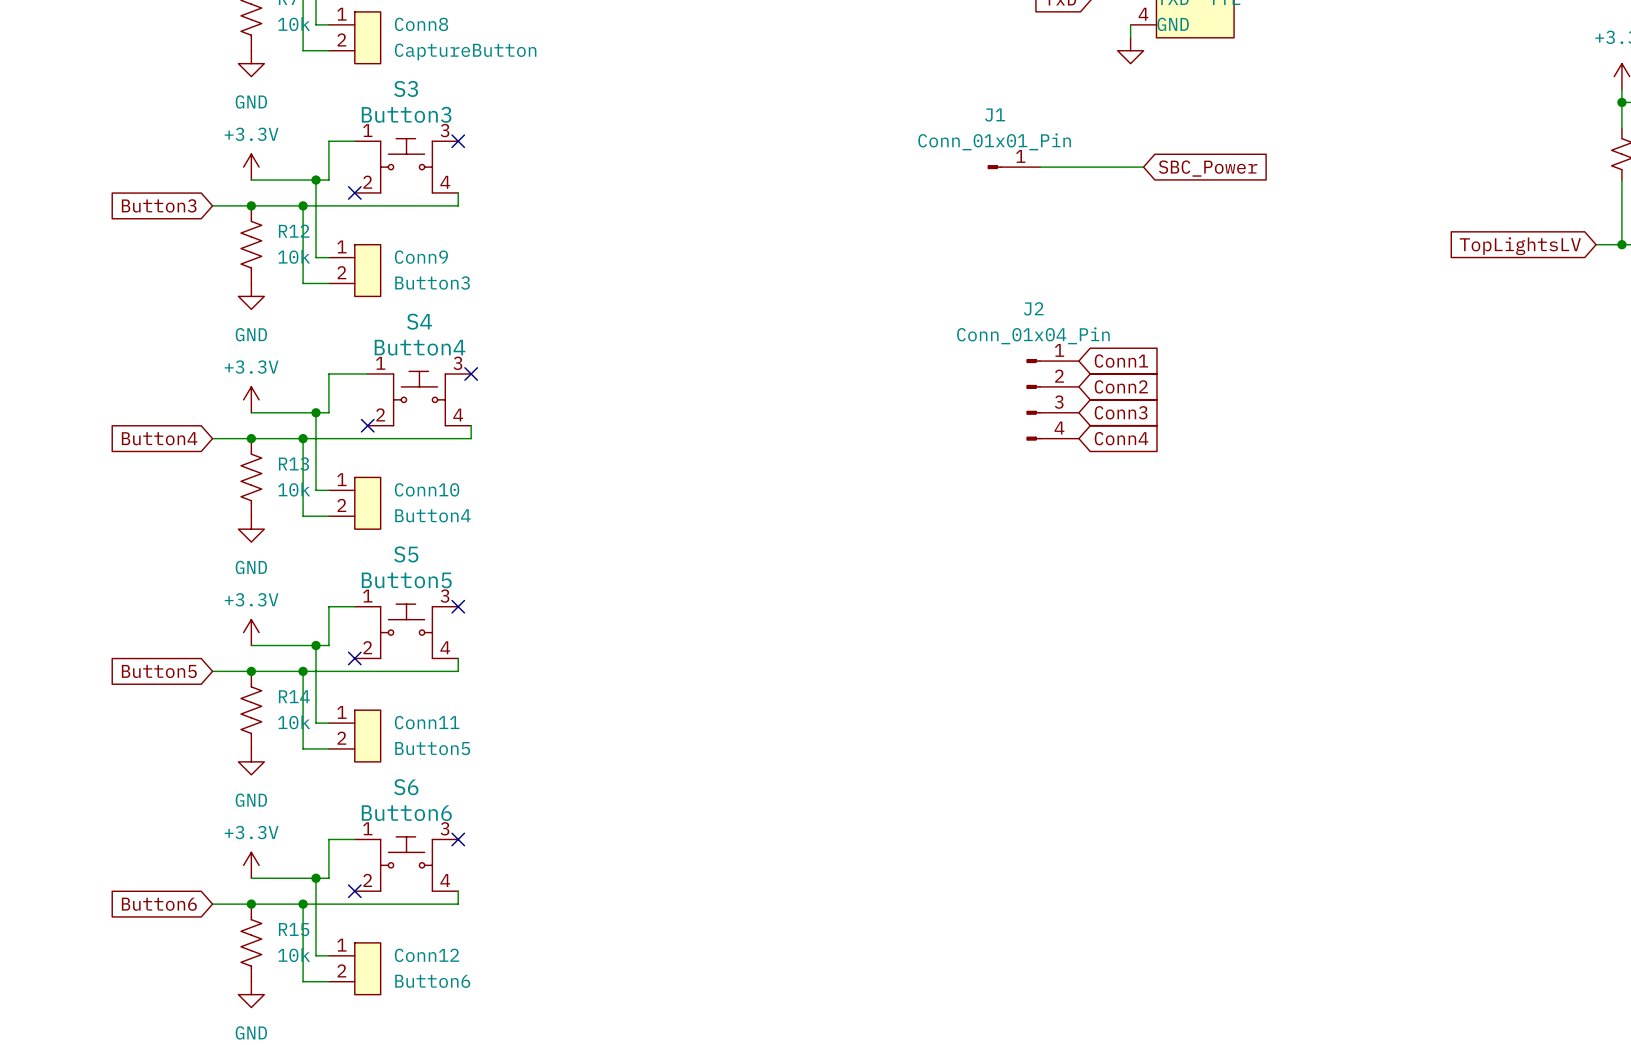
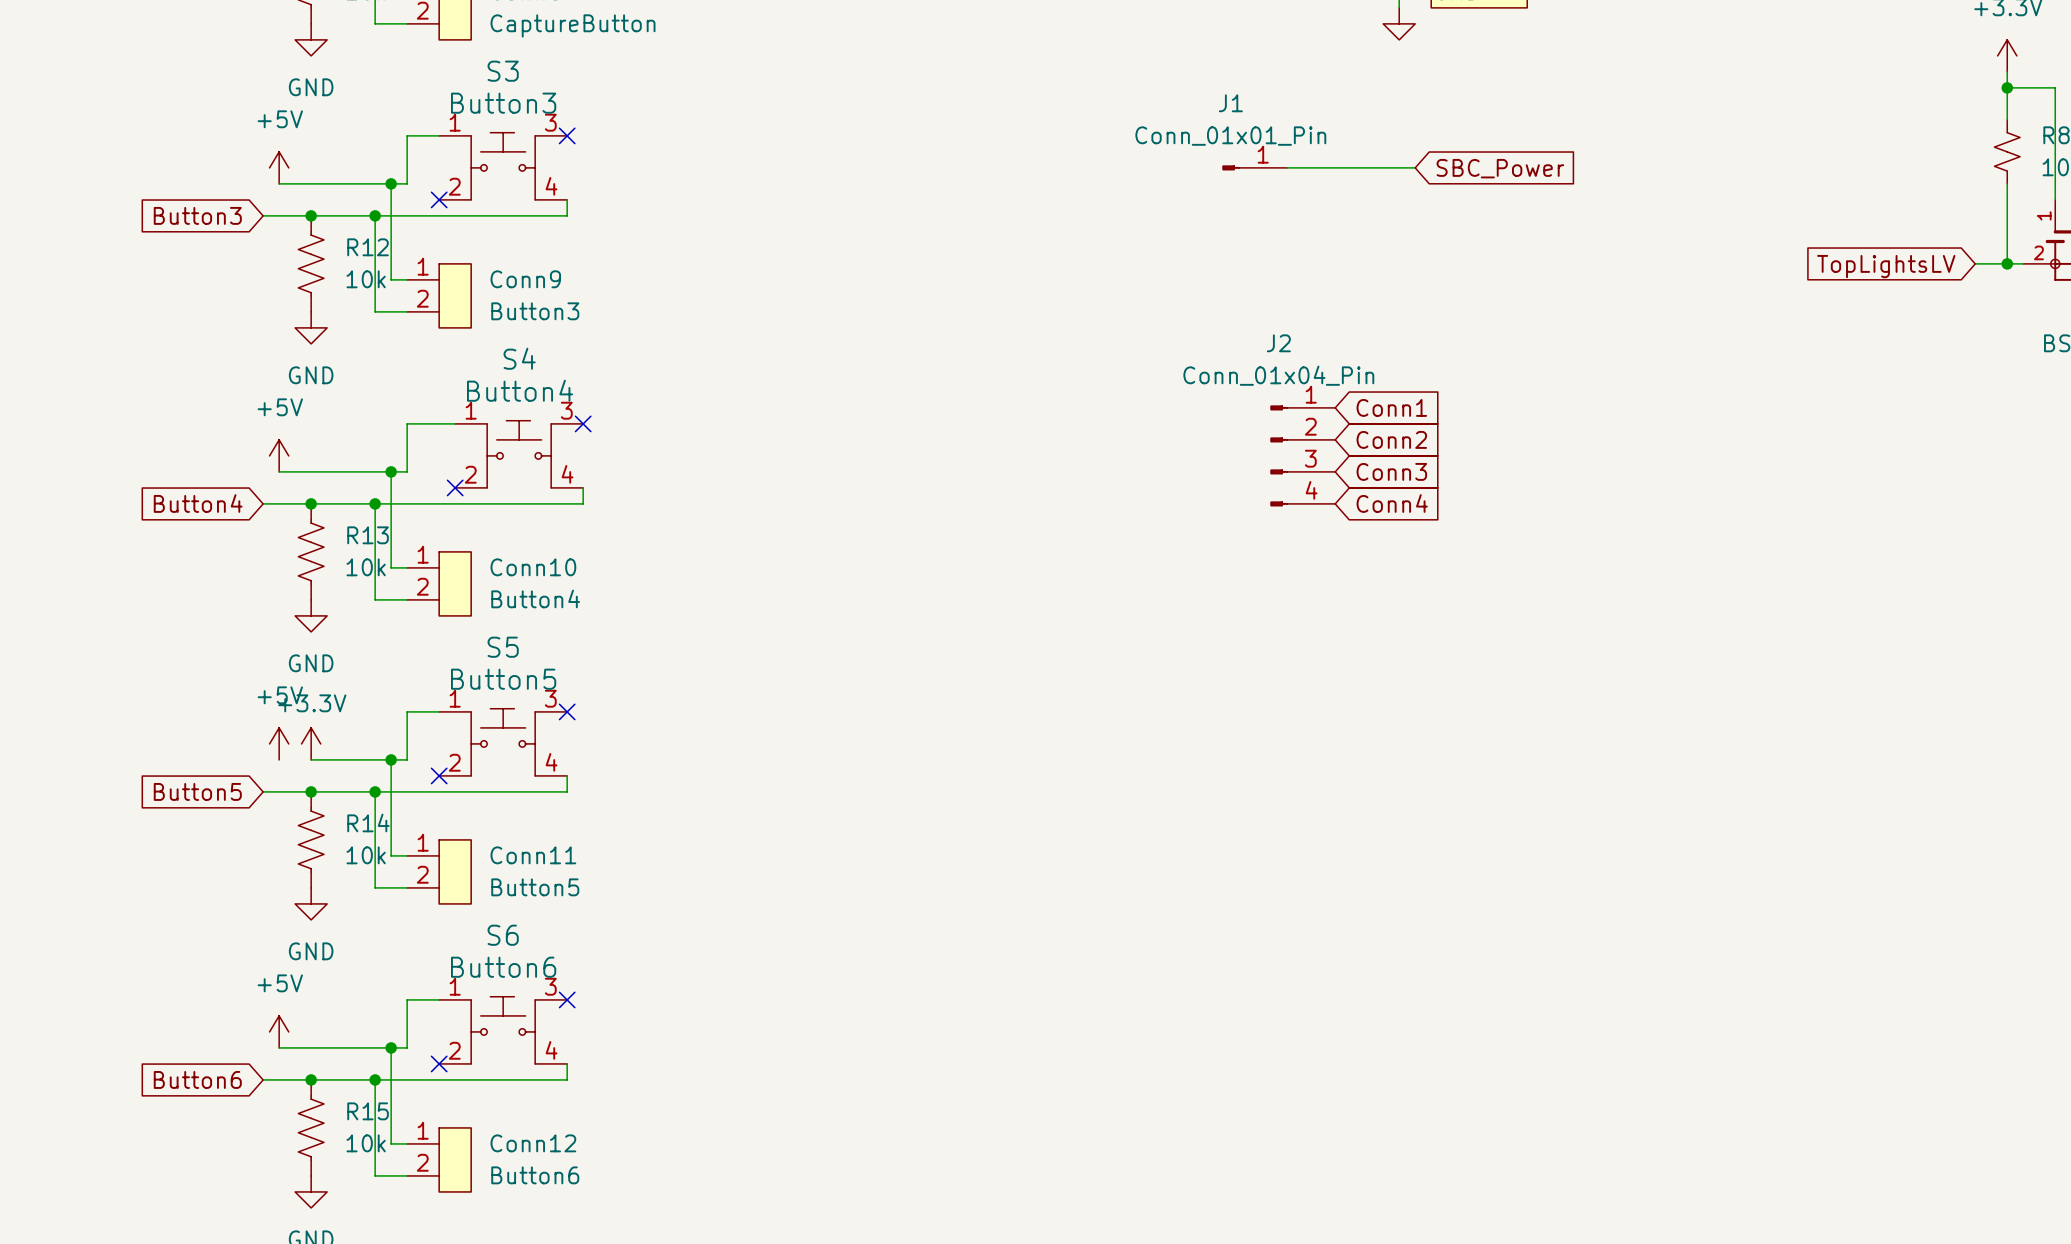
power symbol: none -> +5V (279, 167)
power symbol: +3.3V (251, 167) -> none
wire: none -> (279, 183) (311, 183)
power symbol: none -> +5V (279, 455)
power symbol: +3.3V (251, 399) -> none
wire: none -> (279, 471) (311, 471)
power symbol: none -> +5V (279, 743)
power symbol: none -> +5V (279, 1031)
power symbol: +3.3V (251, 865) -> none
wire: none -> (279, 1047) (311, 1047)

